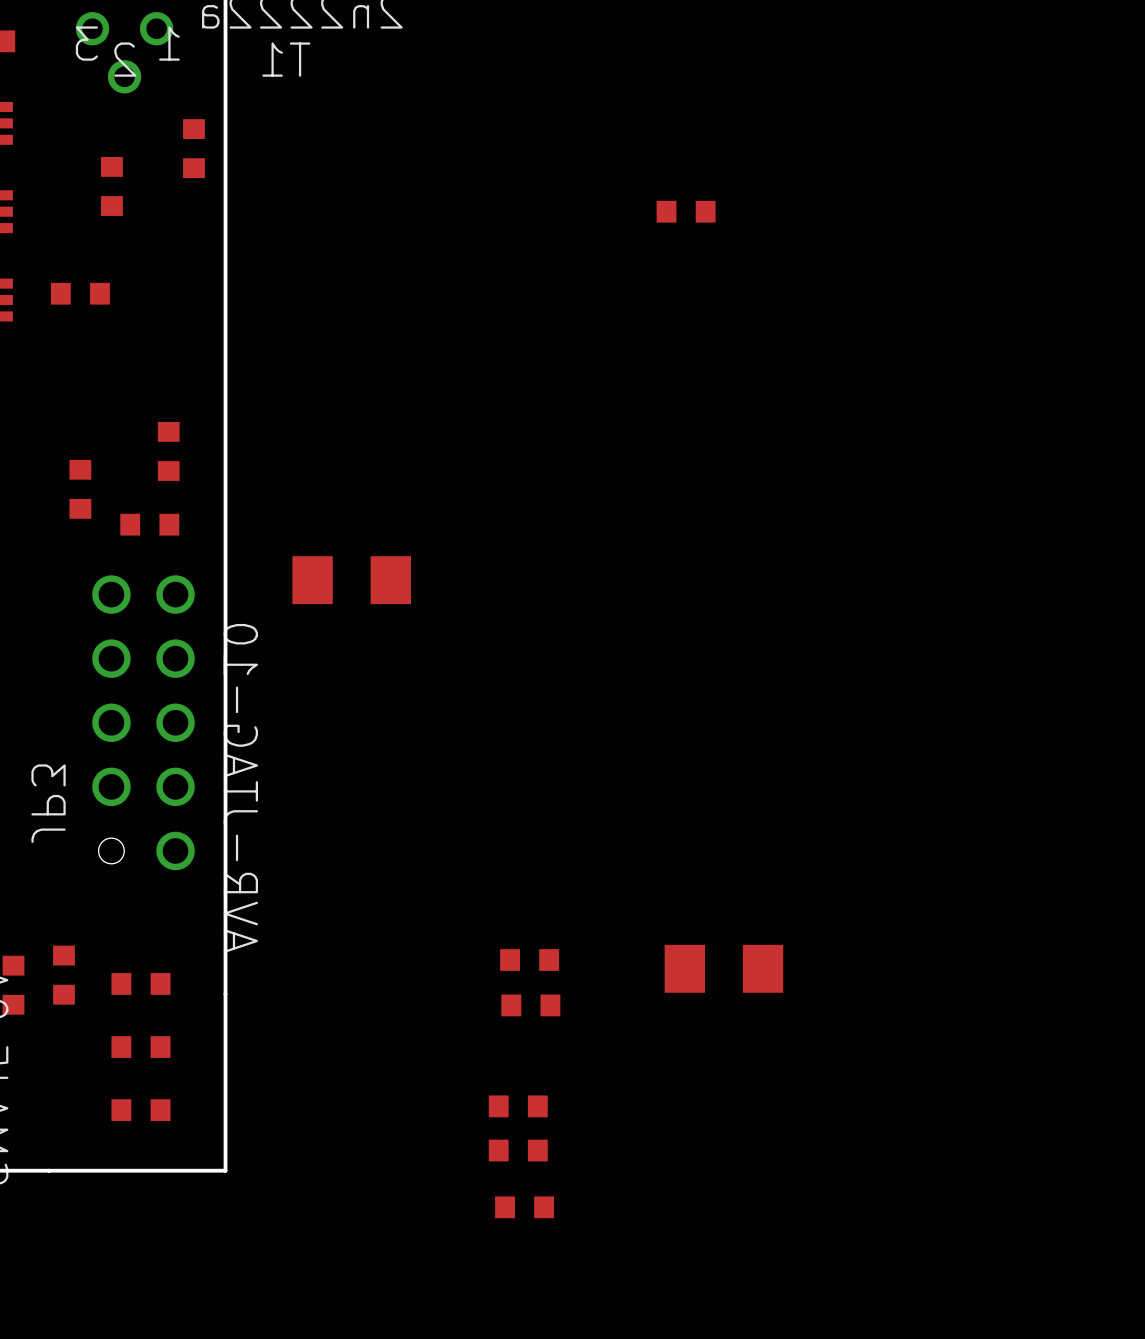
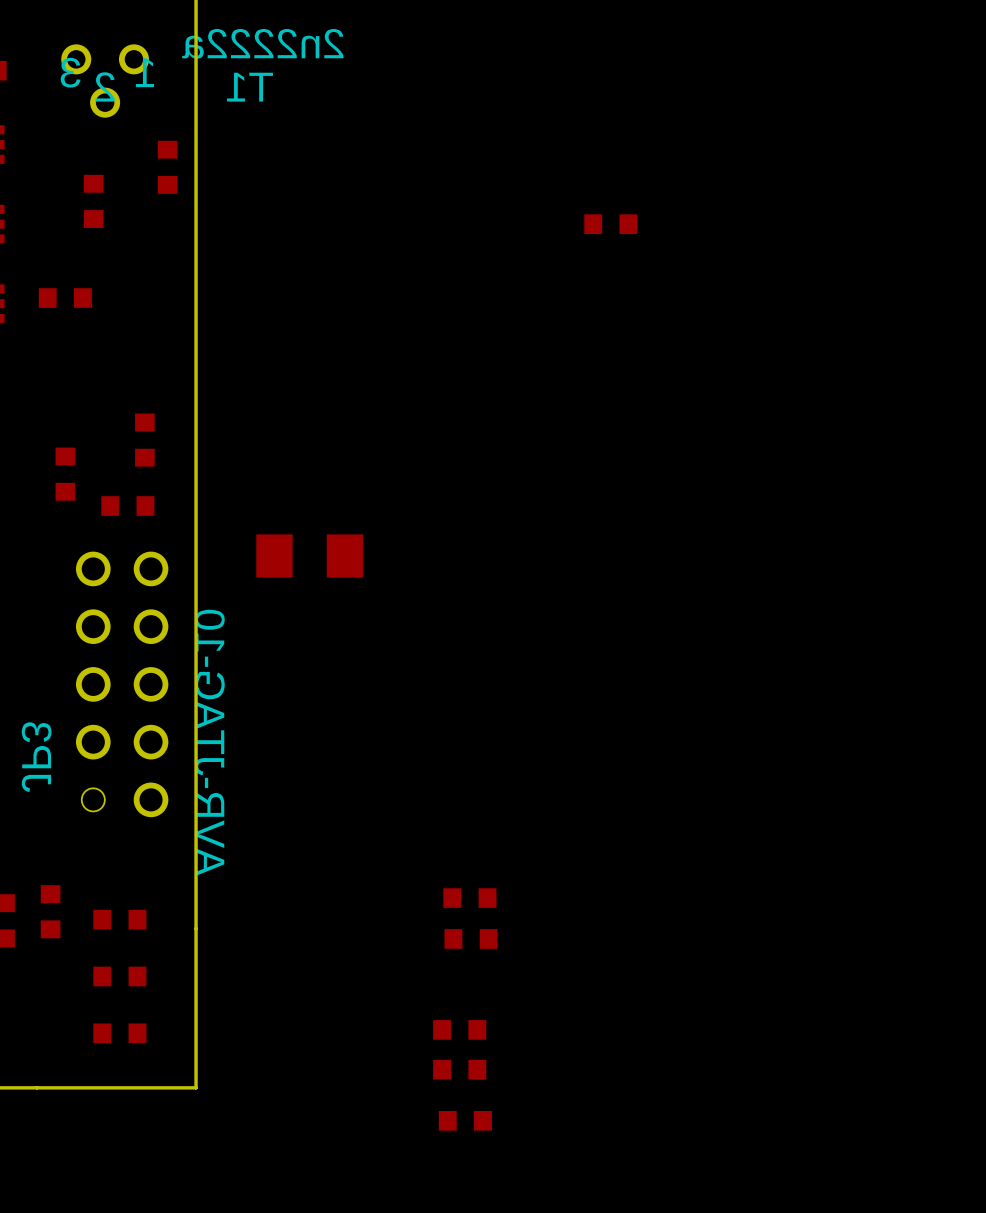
part: (723, 968) -> none

